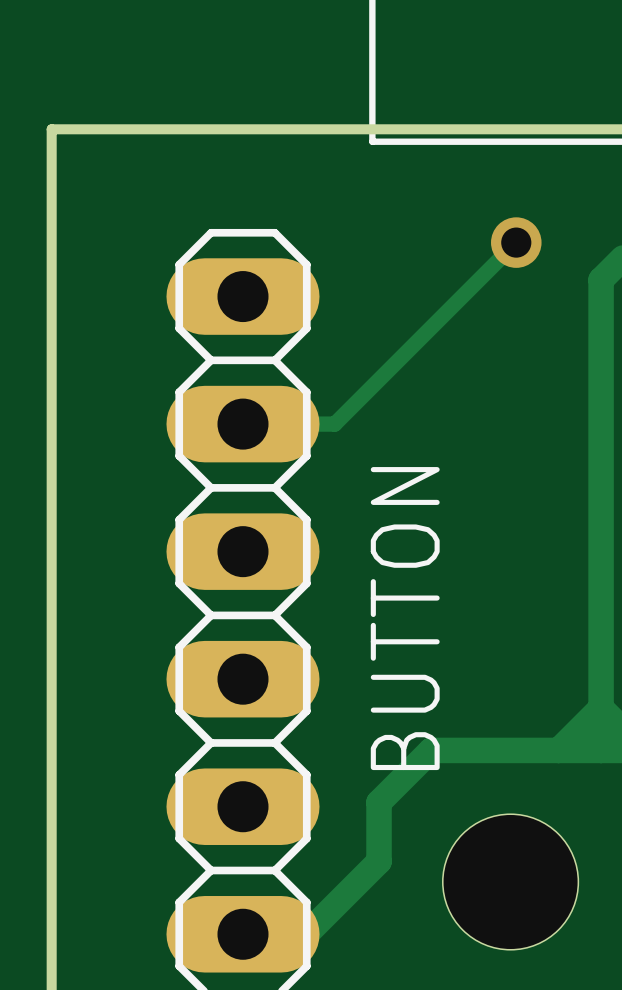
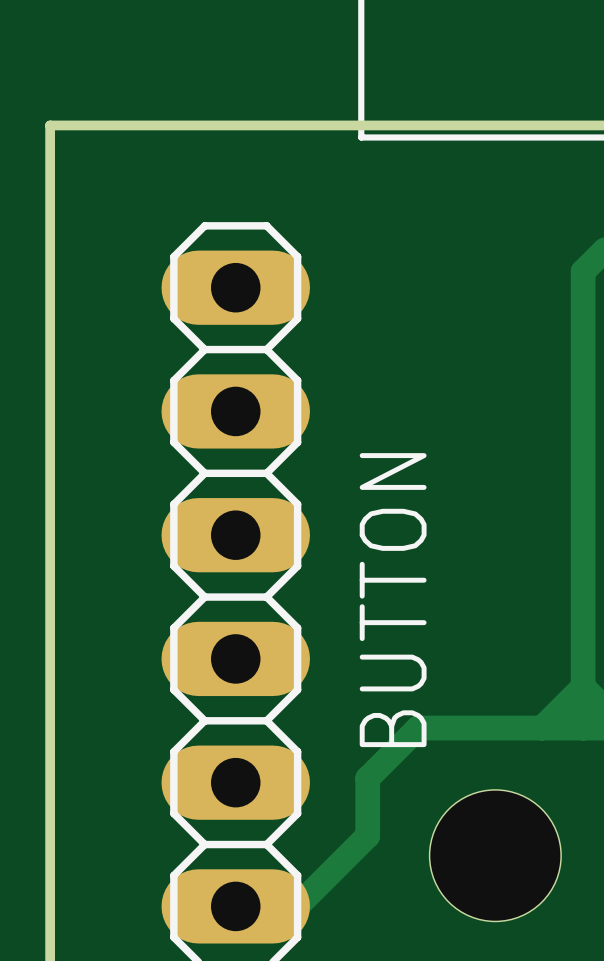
track: (516, 242) (334, 424) (242, 424) -> none
via: (516, 242) -> none

